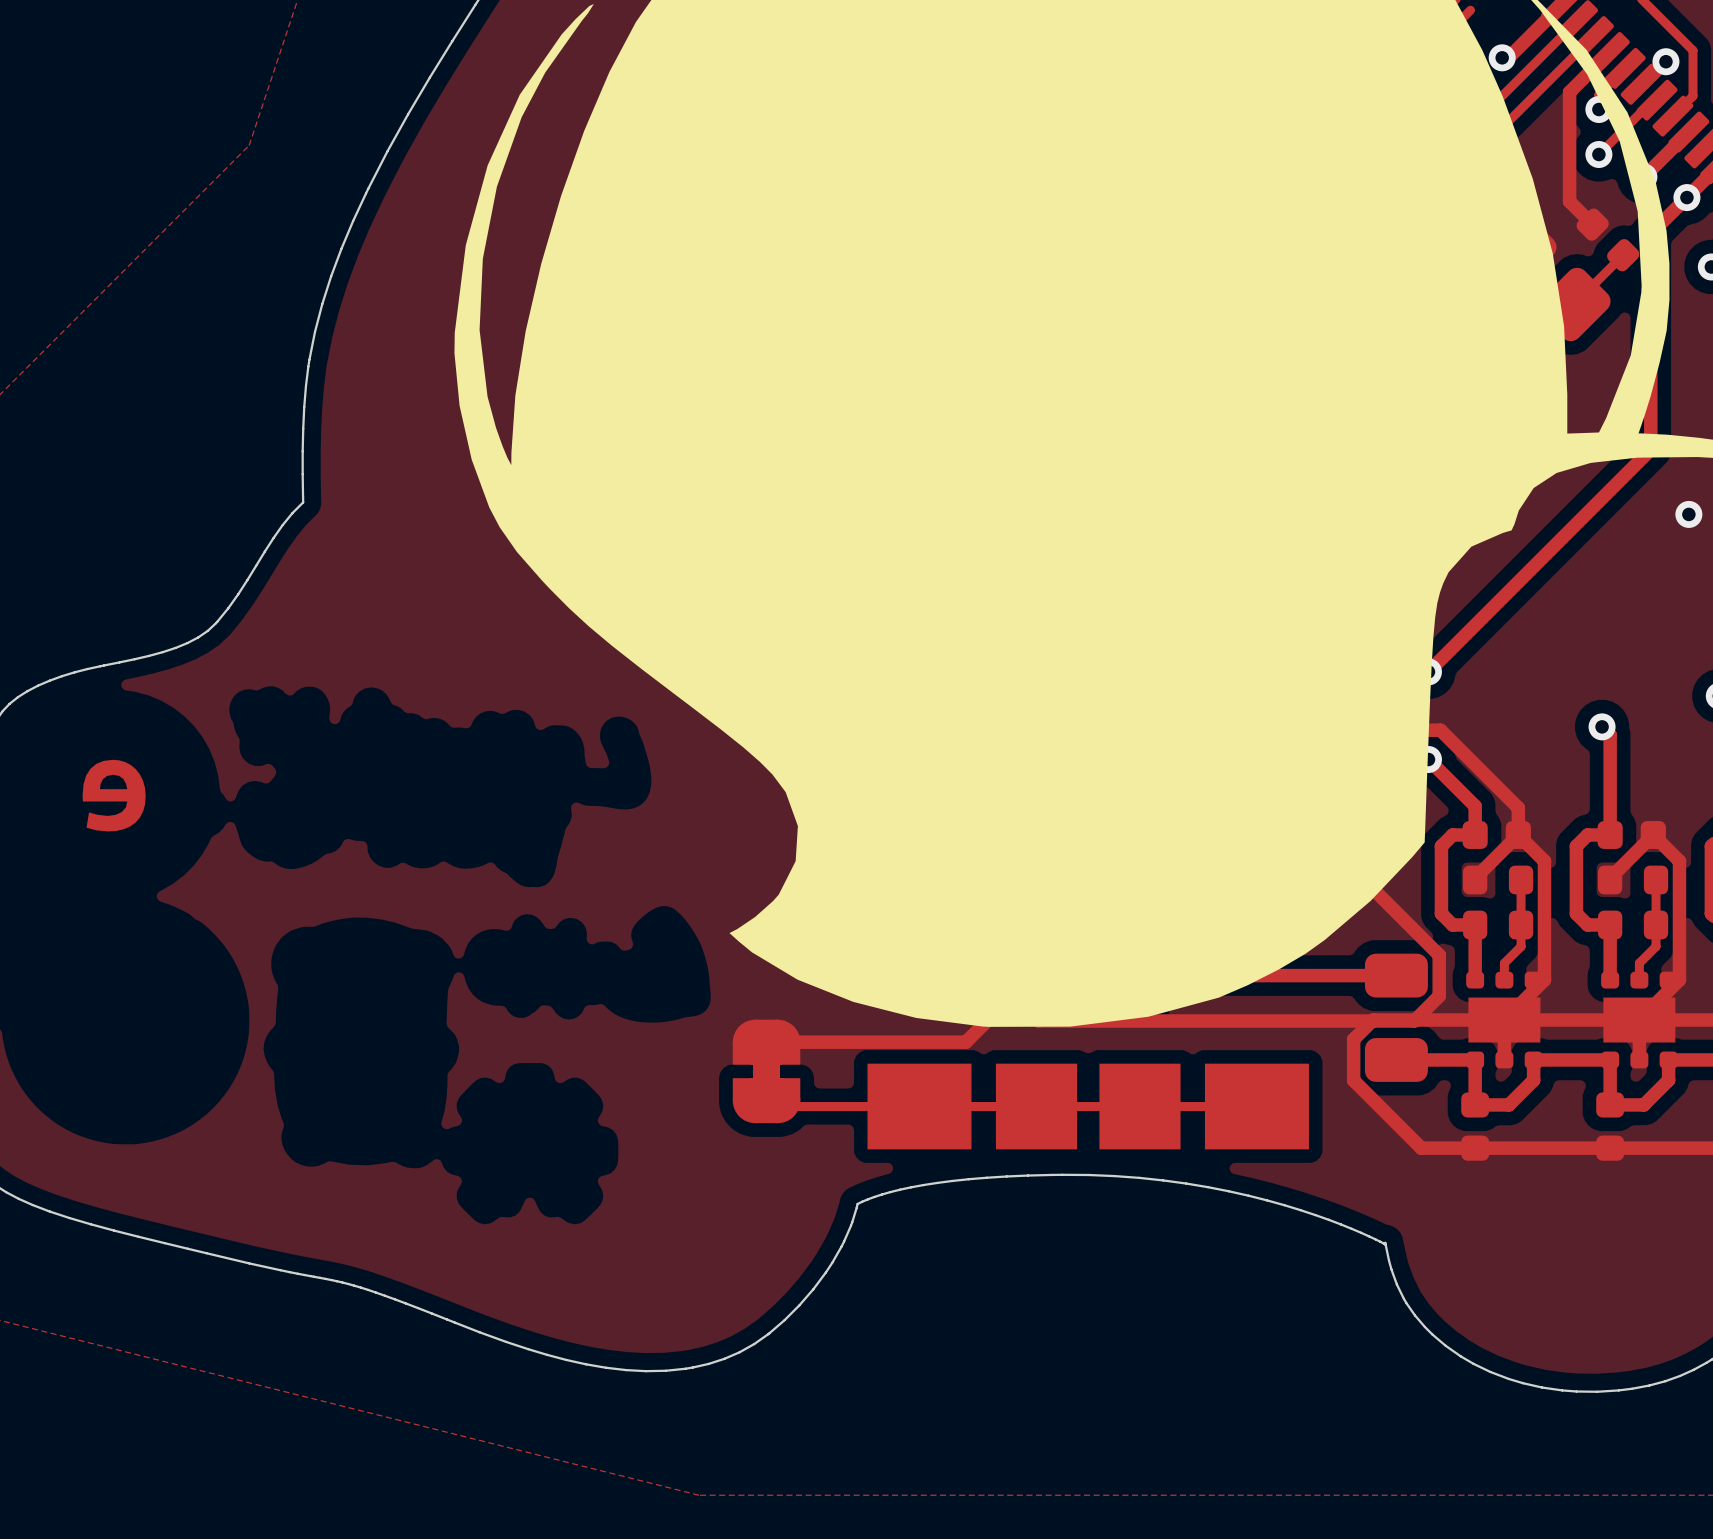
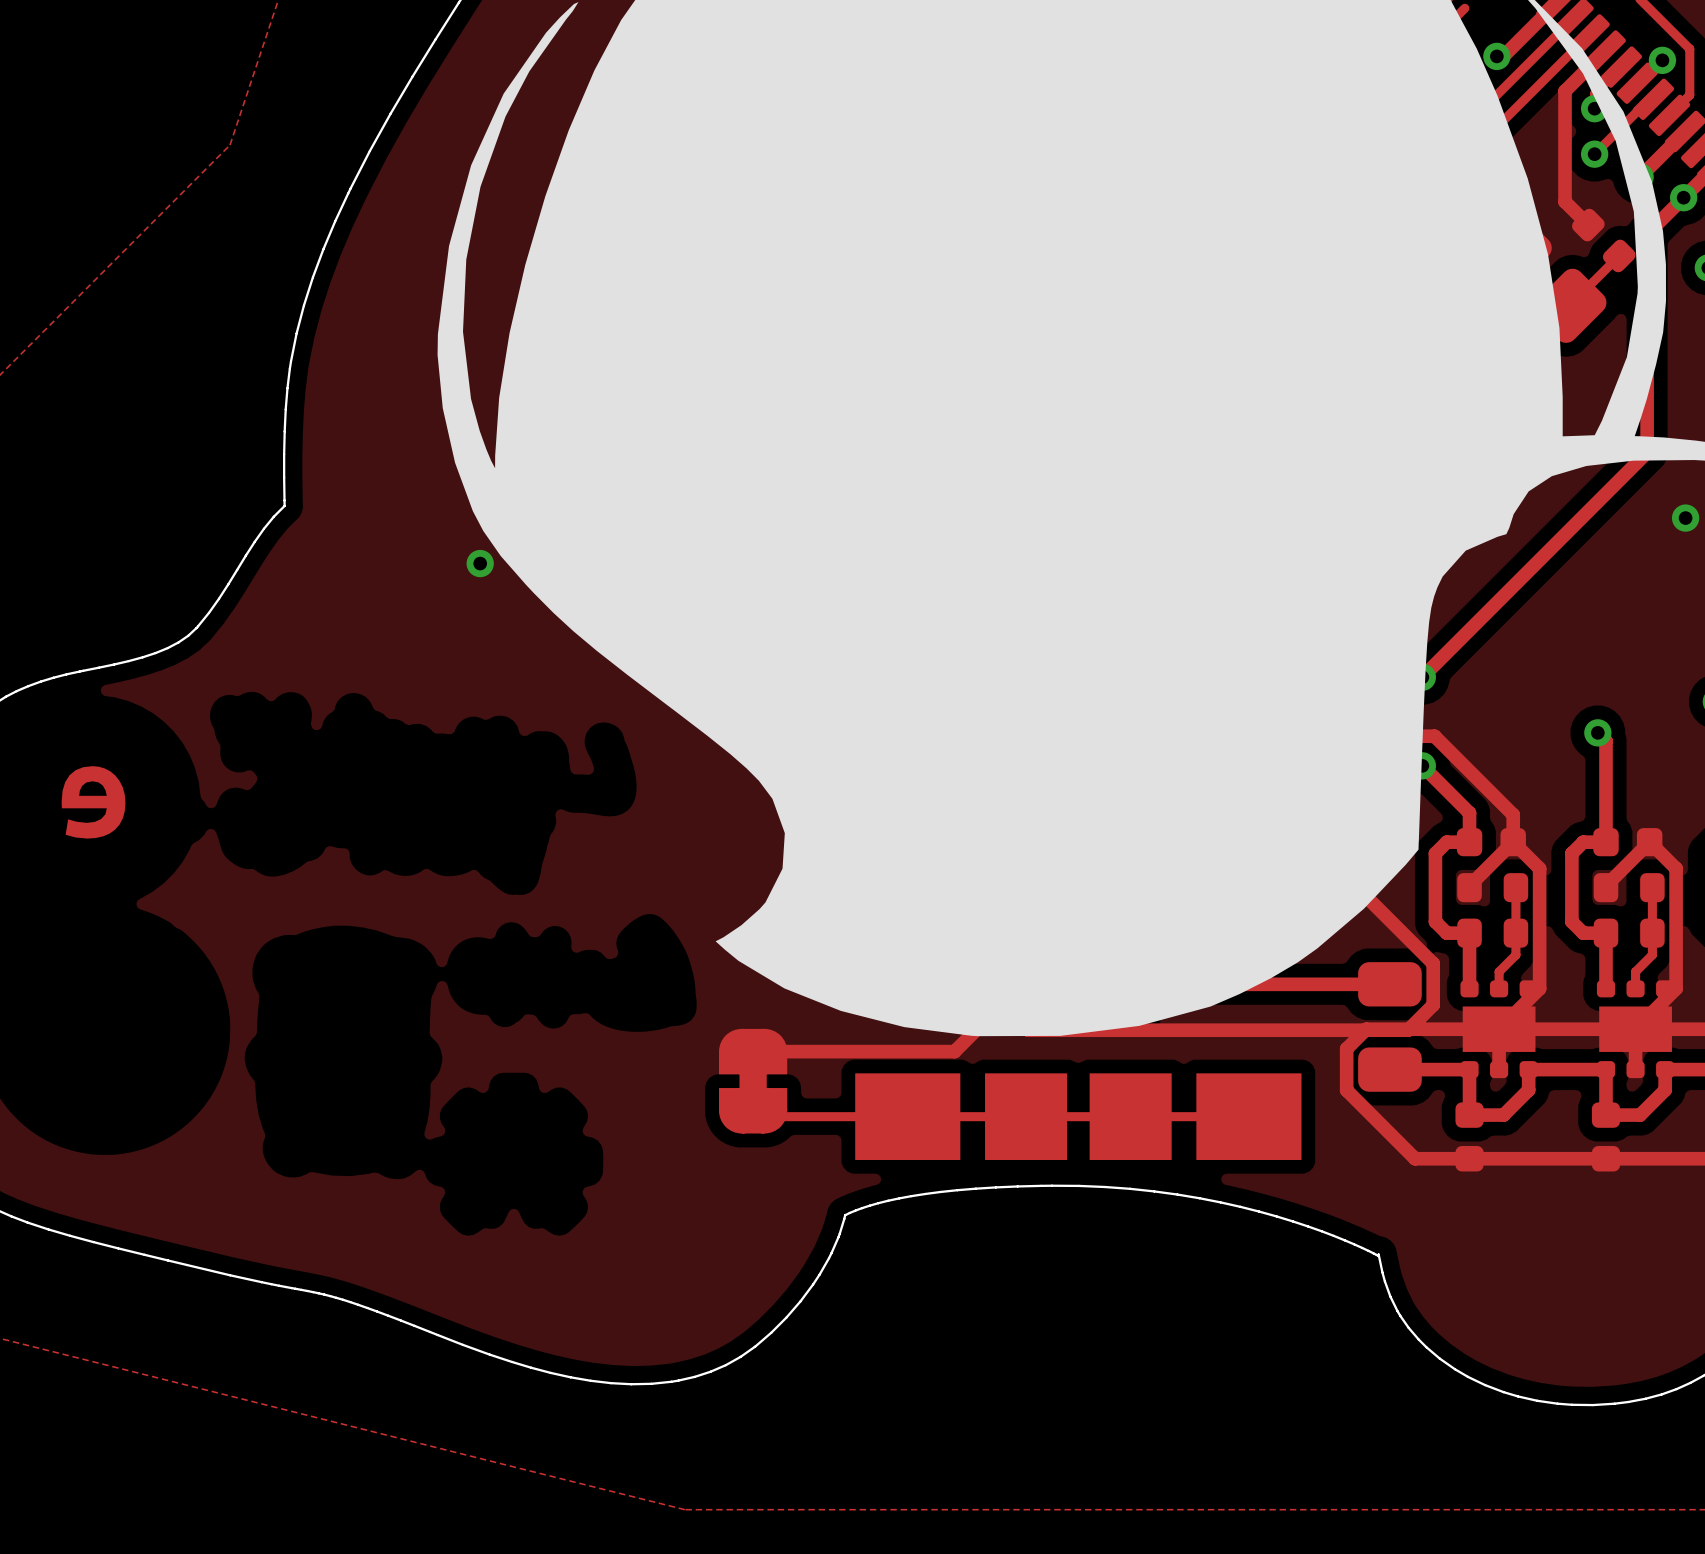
via: none -> (480, 563)

